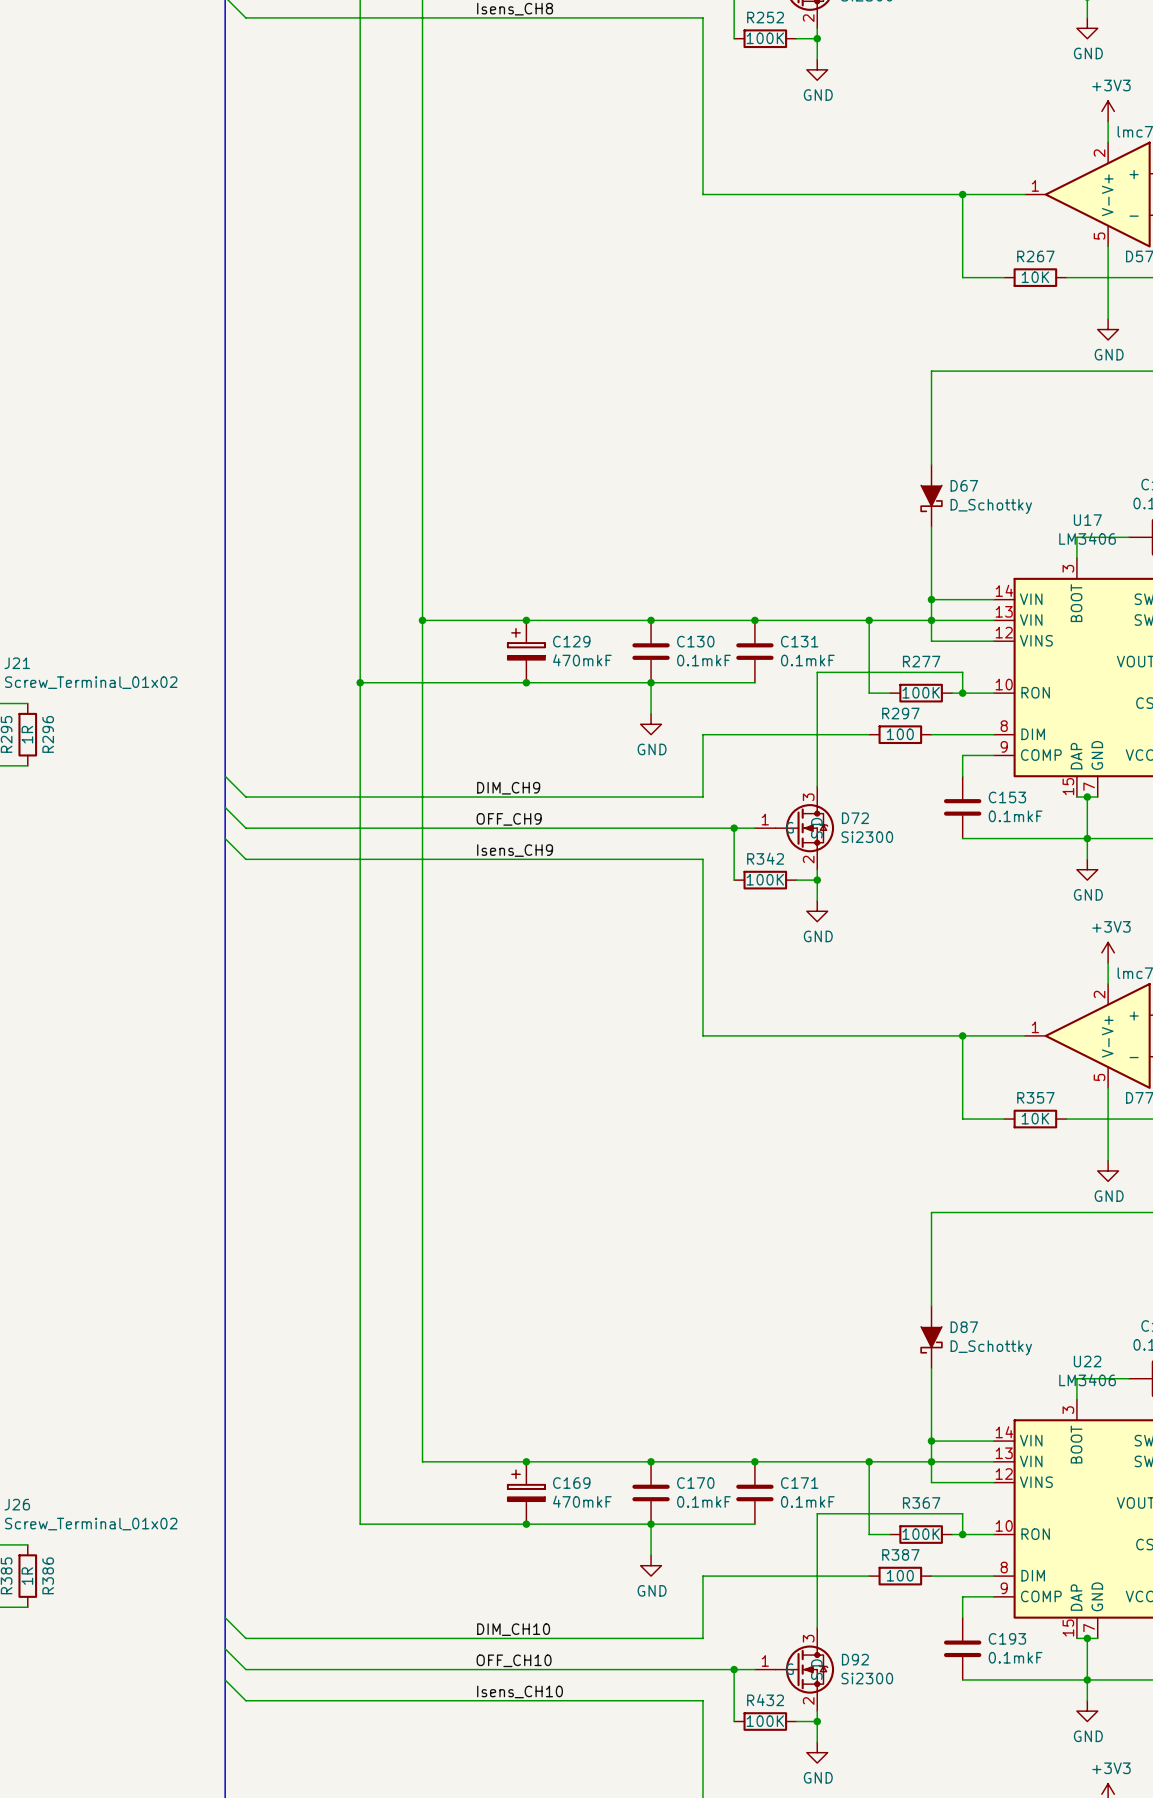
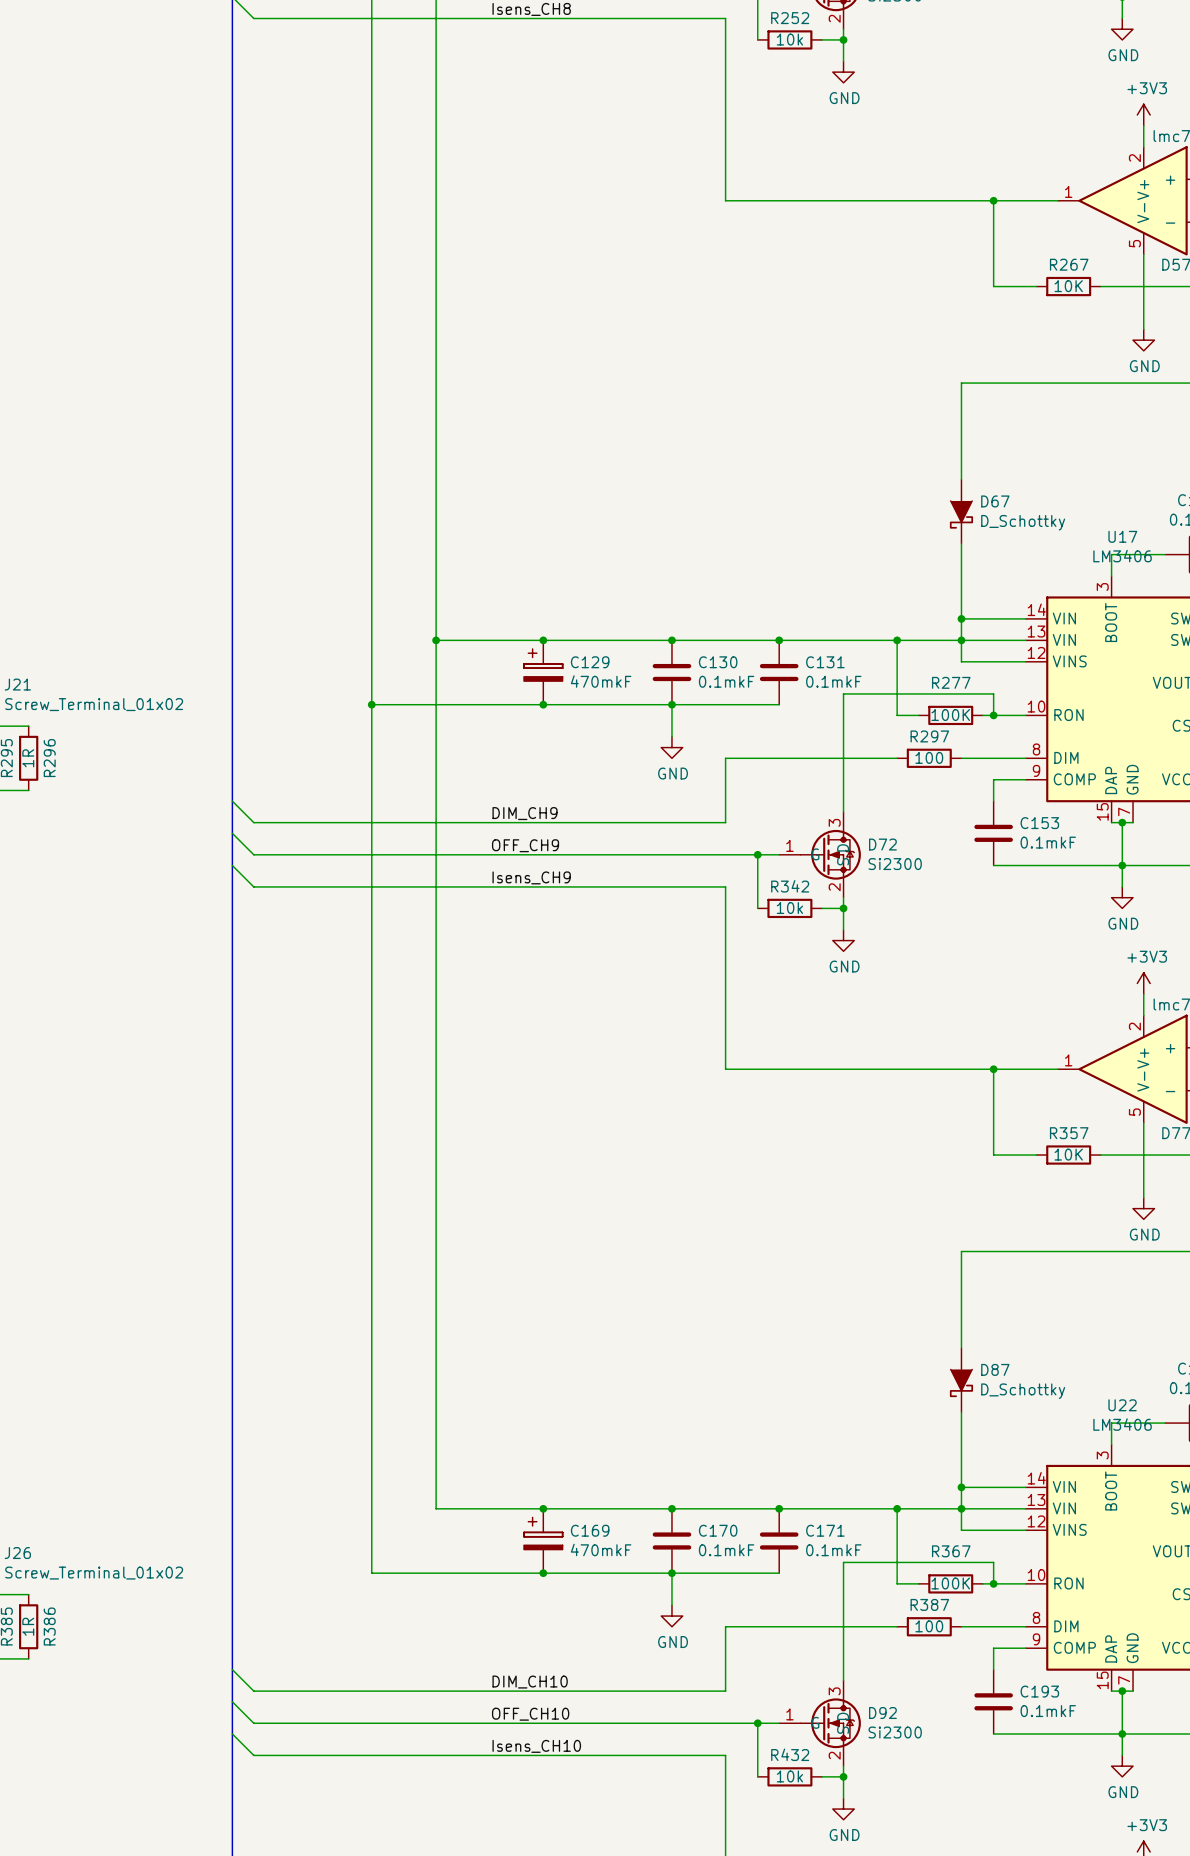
R252 value: 100K (765, 38) -> 10k (789, 39)
R342 value: 100K (765, 879) -> 10k (789, 908)
R432 value: 100K (765, 1721) -> 10k (789, 1776)

